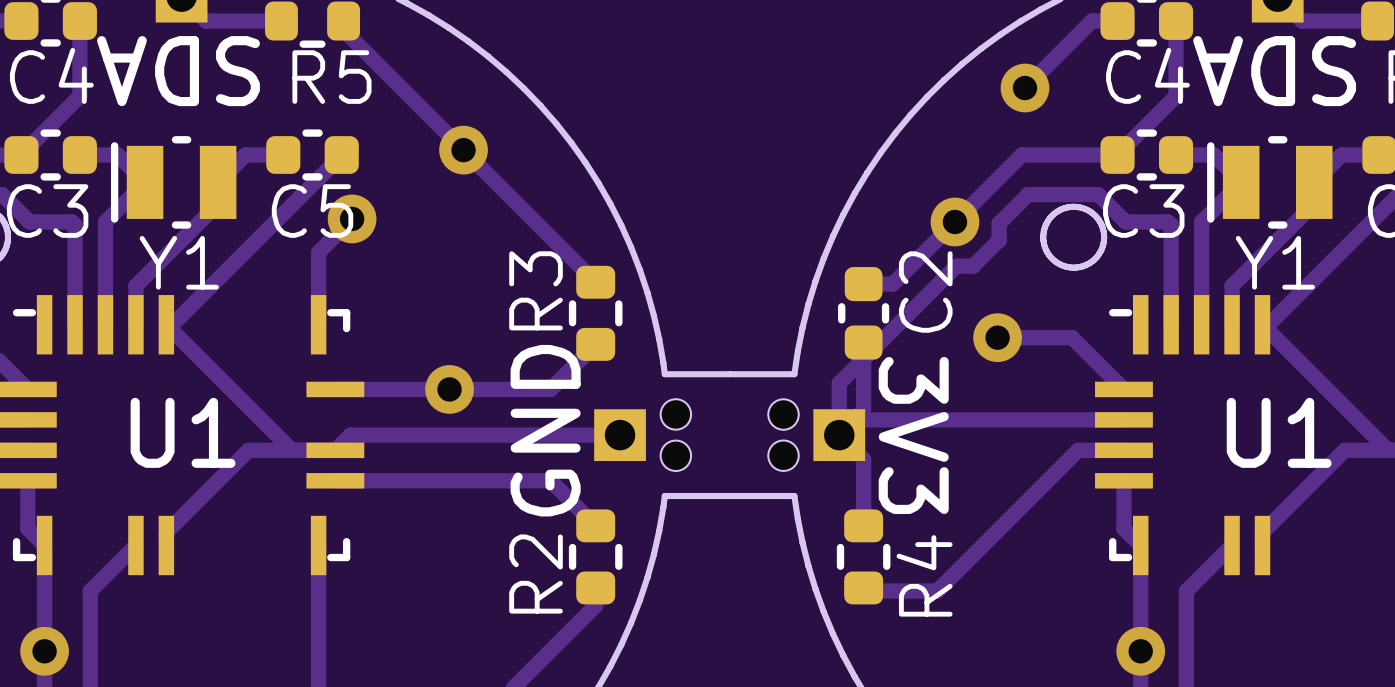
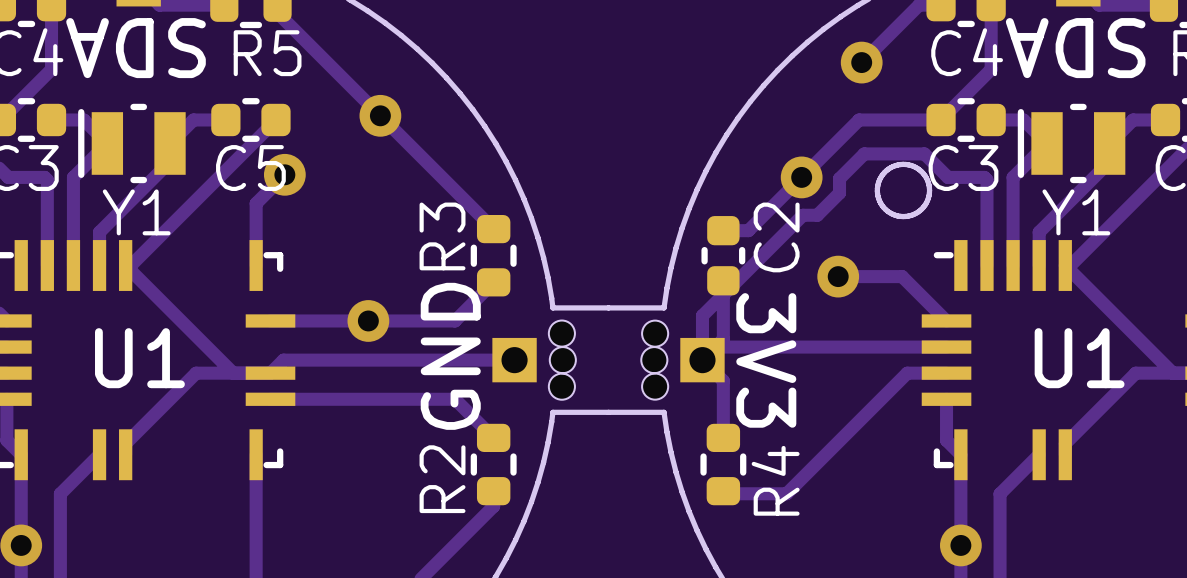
part: none -> (561, 333)
part: none -> (655, 333)
part: (675, 414) -> none
part: (783, 414) -> none
part: none -> (562, 360)
part: none -> (654, 360)
part: (675, 455) -> none
part: (783, 455) -> none
part: none -> (561, 386)
part: none -> (655, 386)

